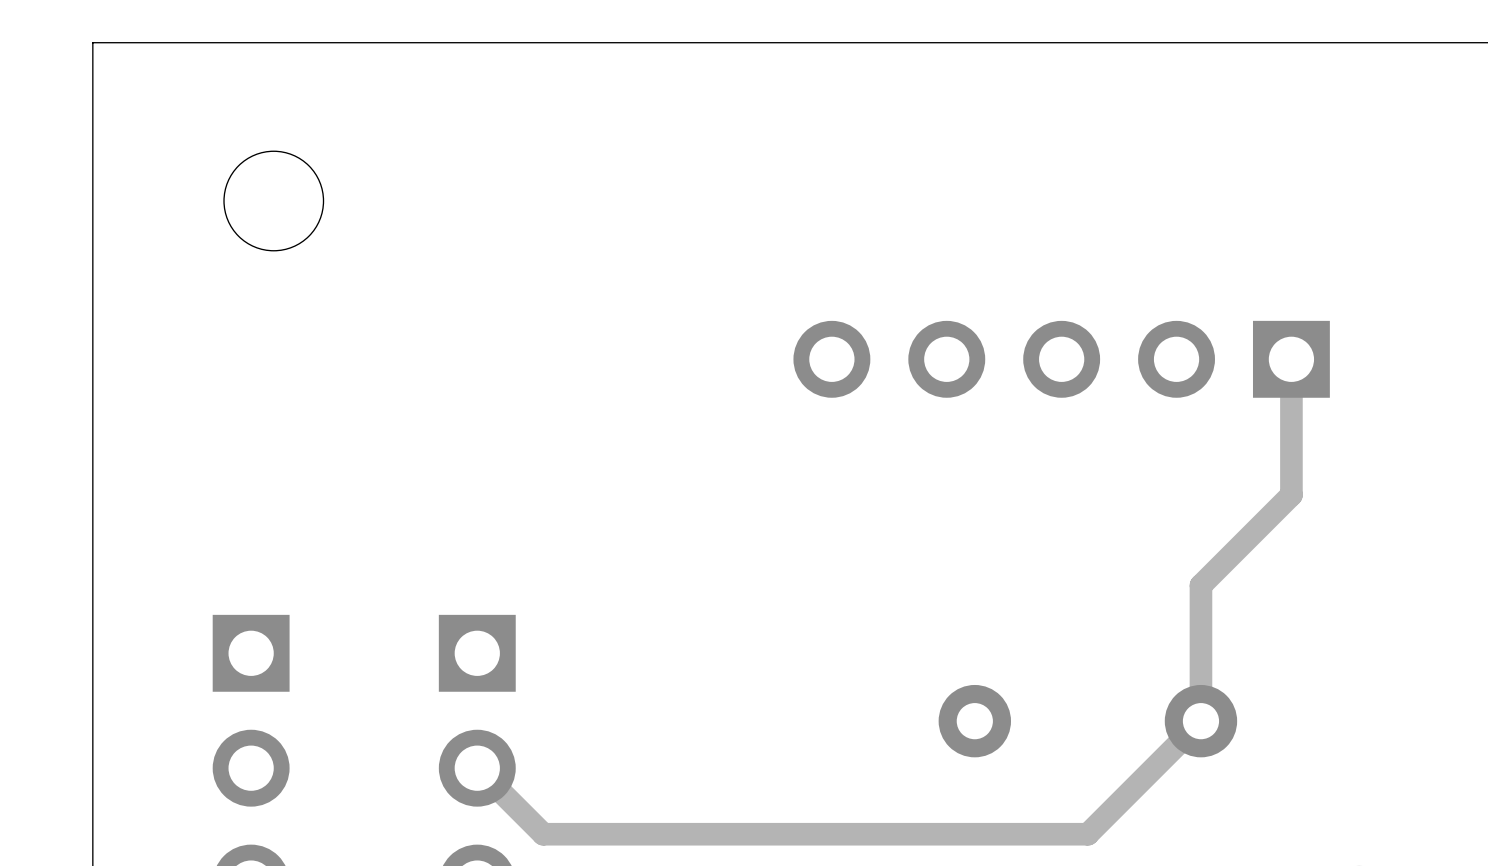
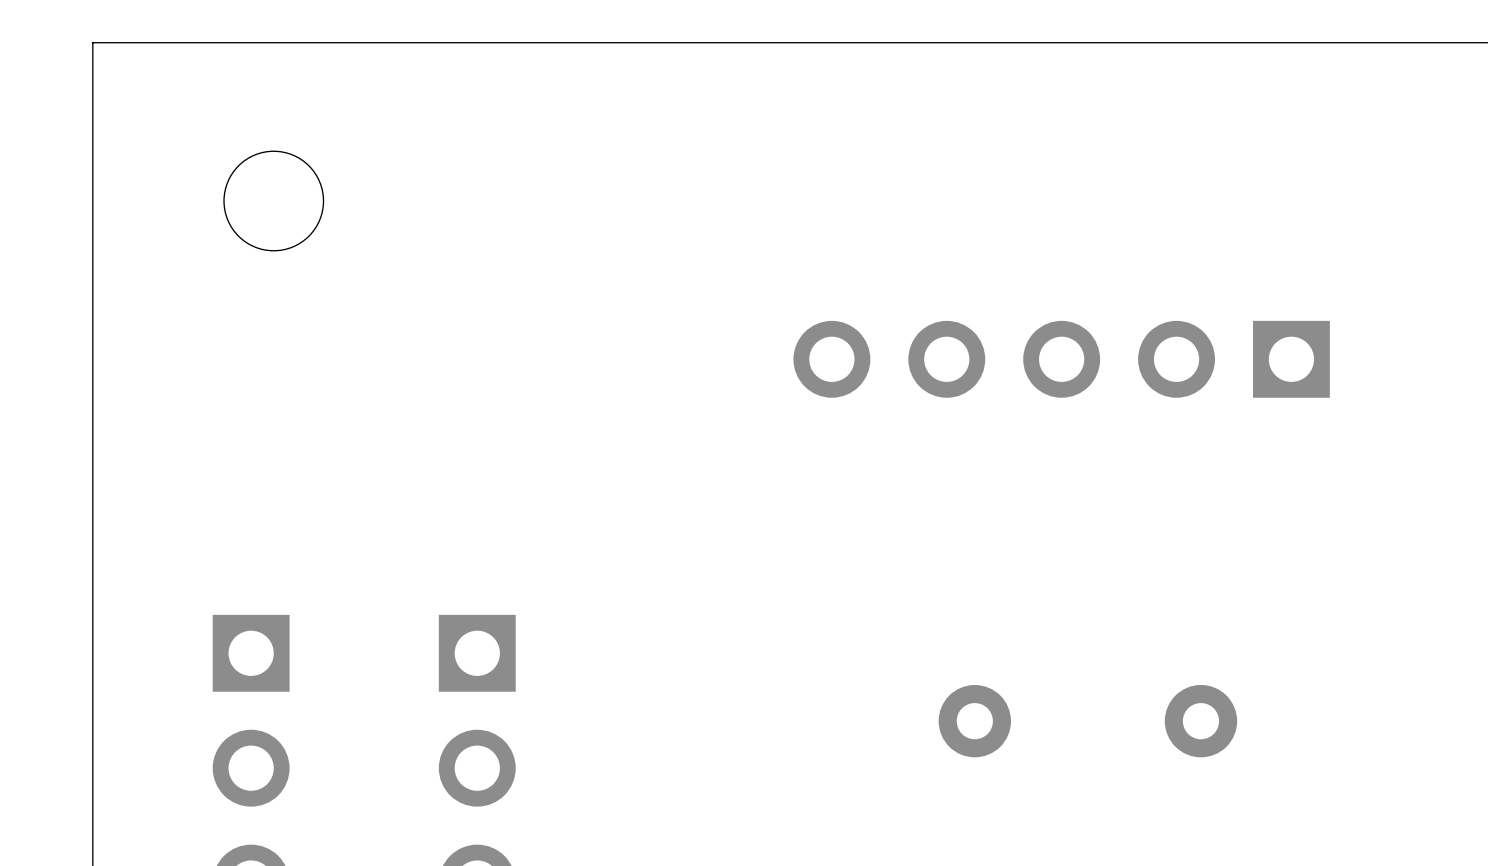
track: (1291, 359) (1291, 495) (1200, 585) (1200, 721) (1087, 834) (543, 834) (477, 768) -> none

